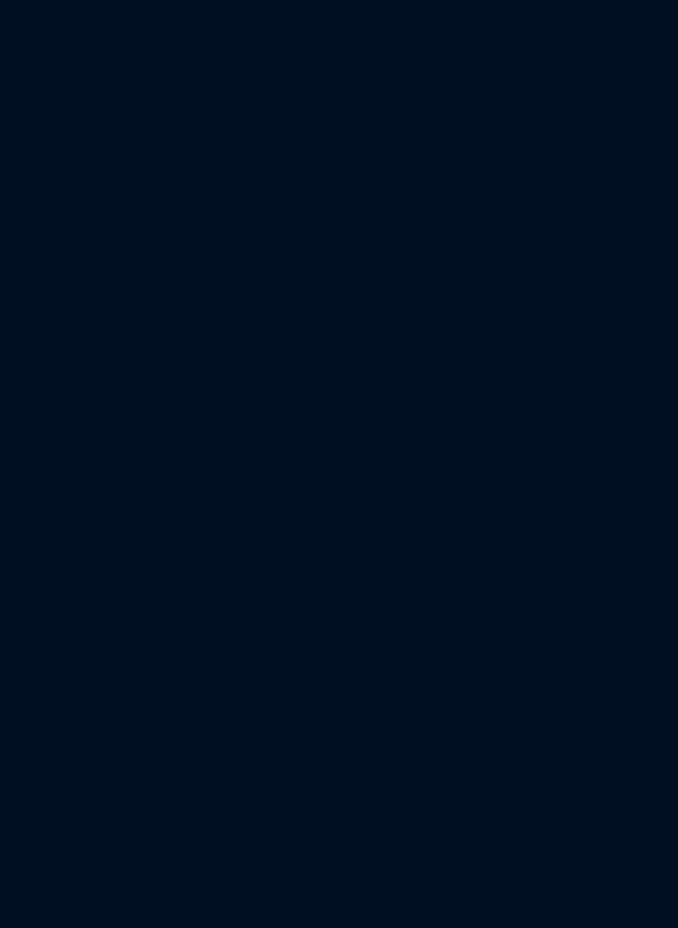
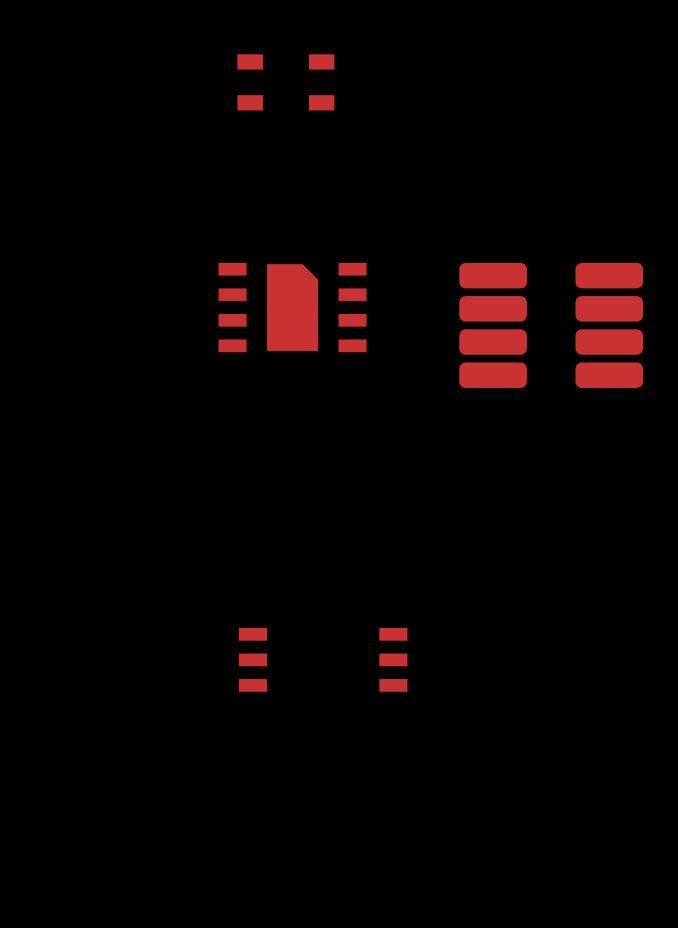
part: none -> (285, 82)
part: none -> (292, 307)
part: none -> (551, 325)
part: none -> (323, 659)

